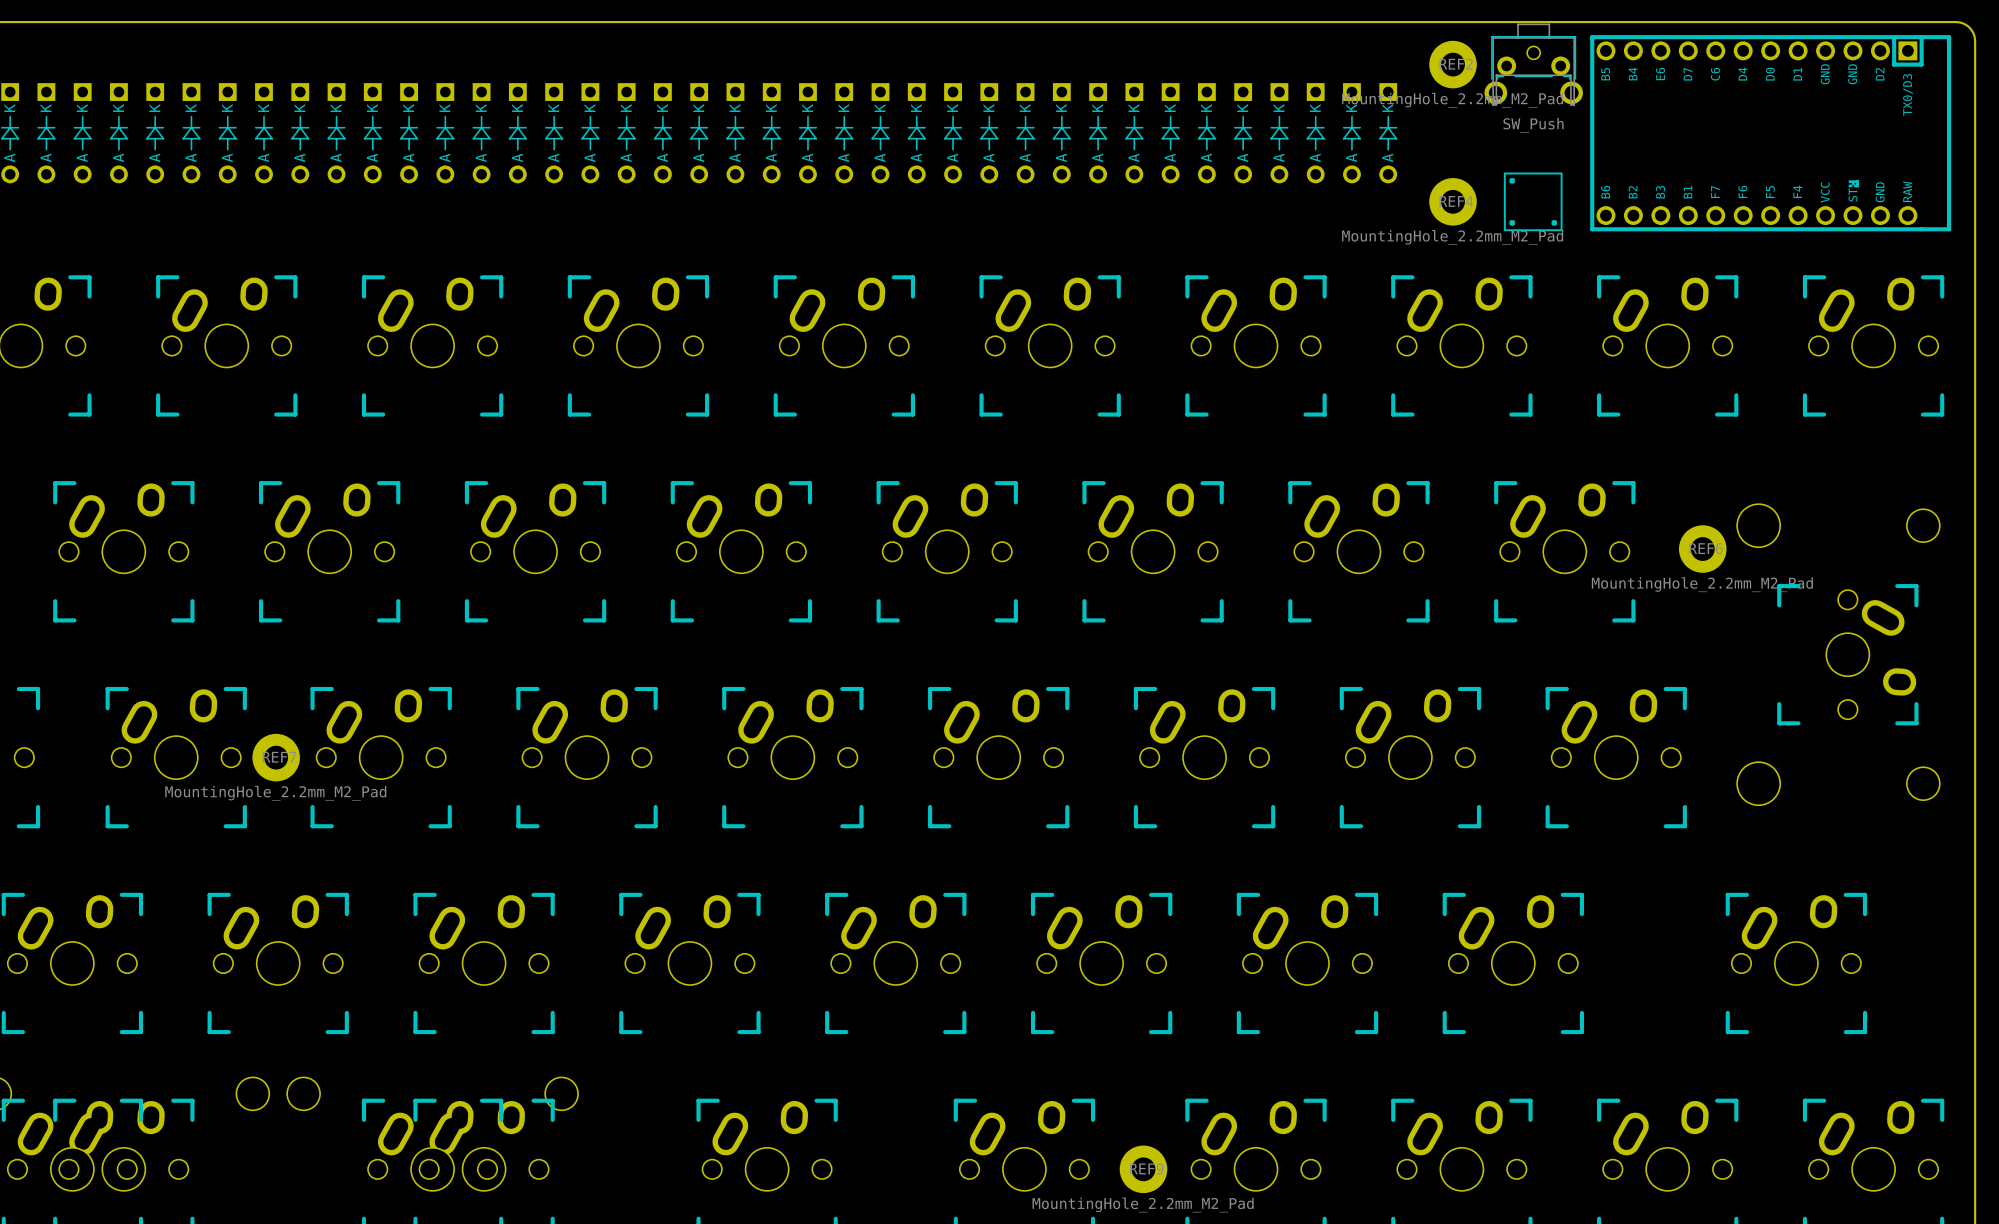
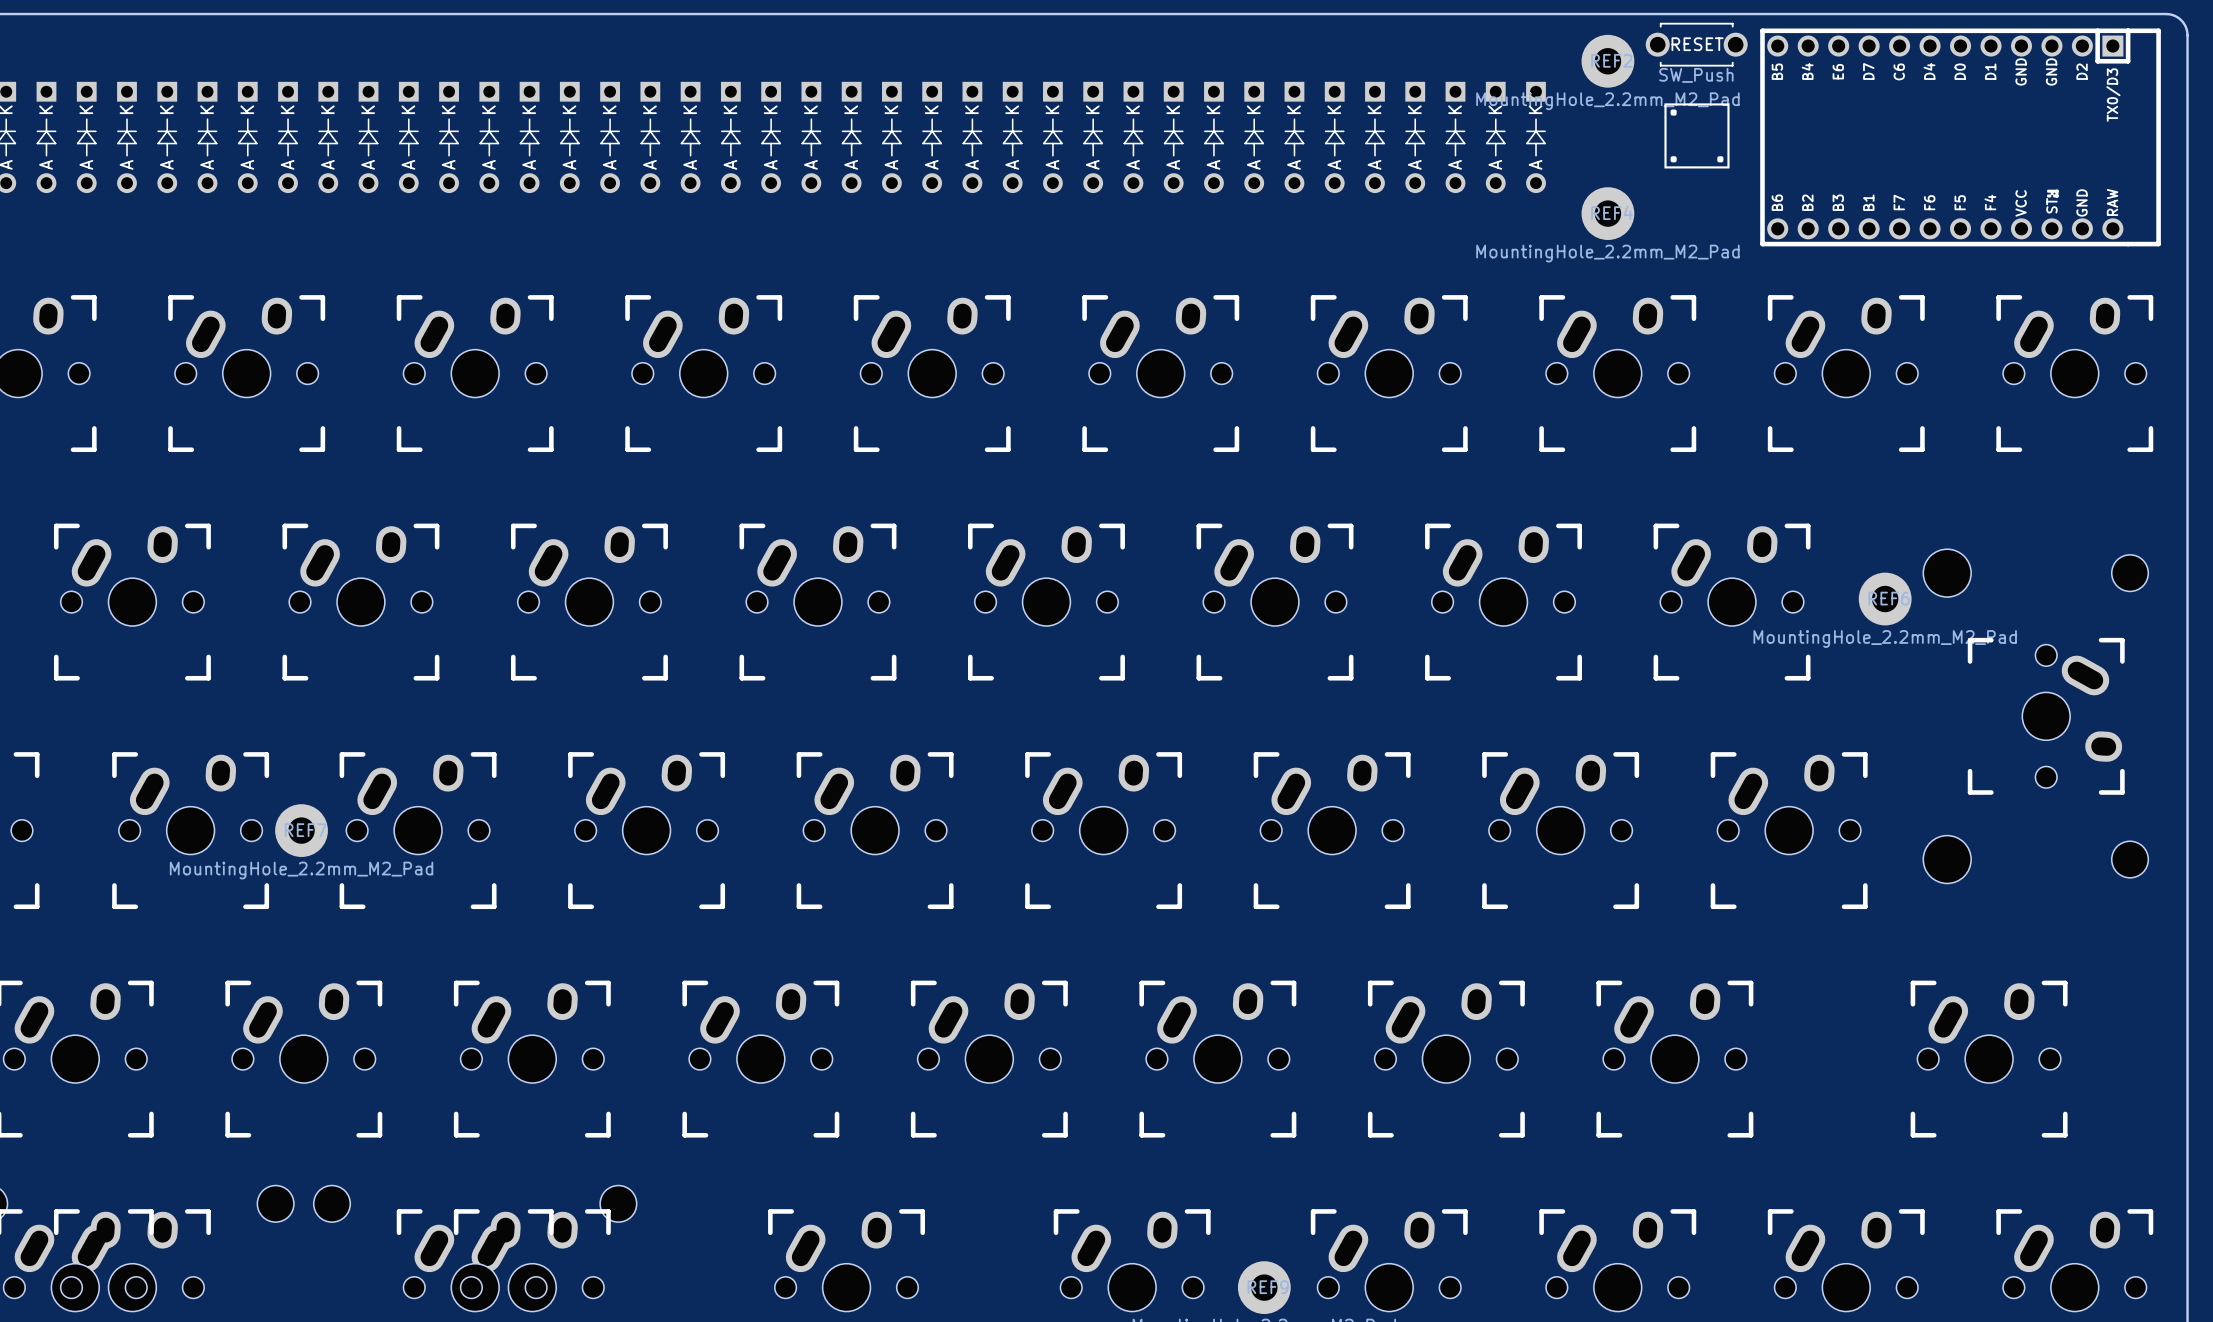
part: none -> SW_Push (1696, 44)
part: SW_Push (1533, 64) -> none
drawing position: (1533, 201) -> (1696, 135)

